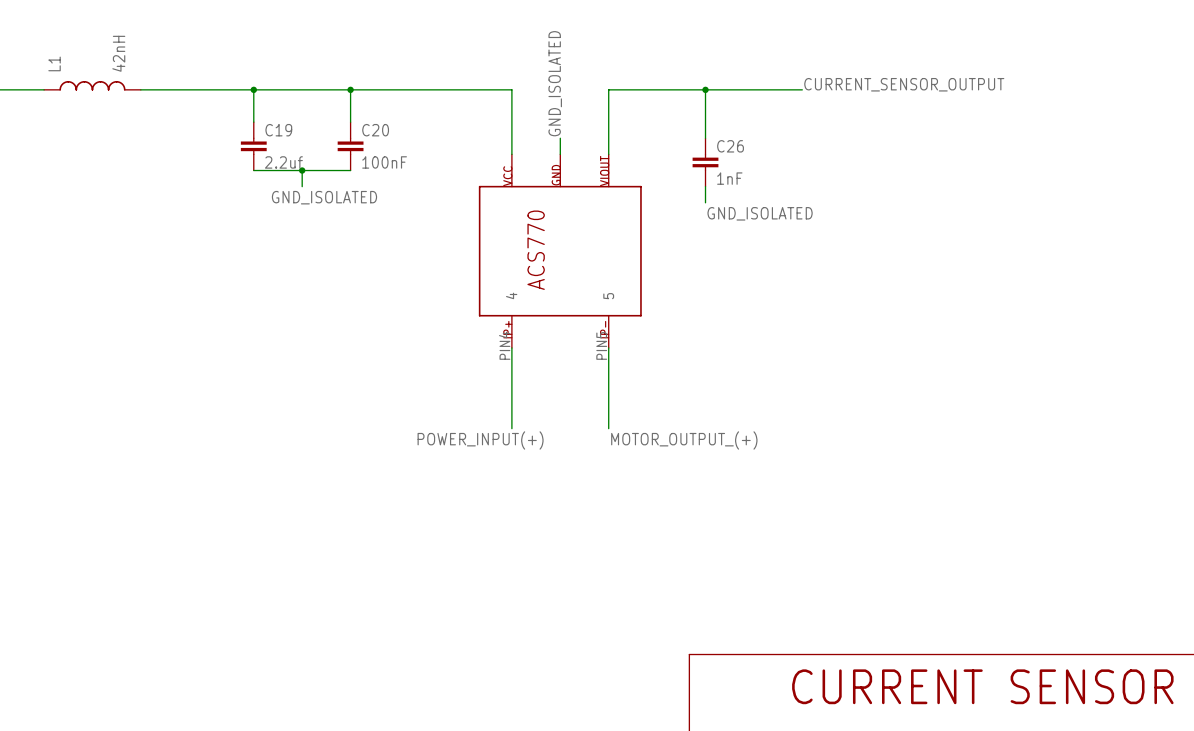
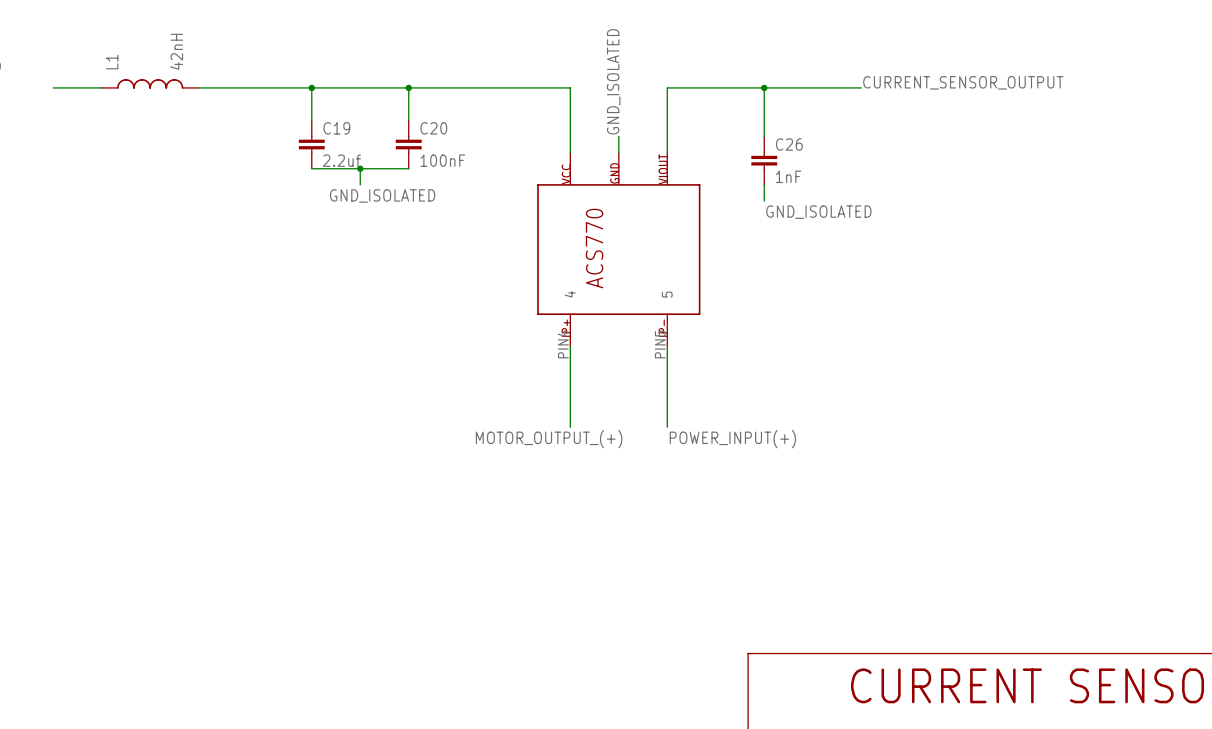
label: POWER_INPUT(+) (480, 440) -> MOTOR_OUTPUT_(+) (549, 439)
label: MOTOR_OUTPUT_(+) (684, 440) -> POWER_INPUT(+) (732, 439)

